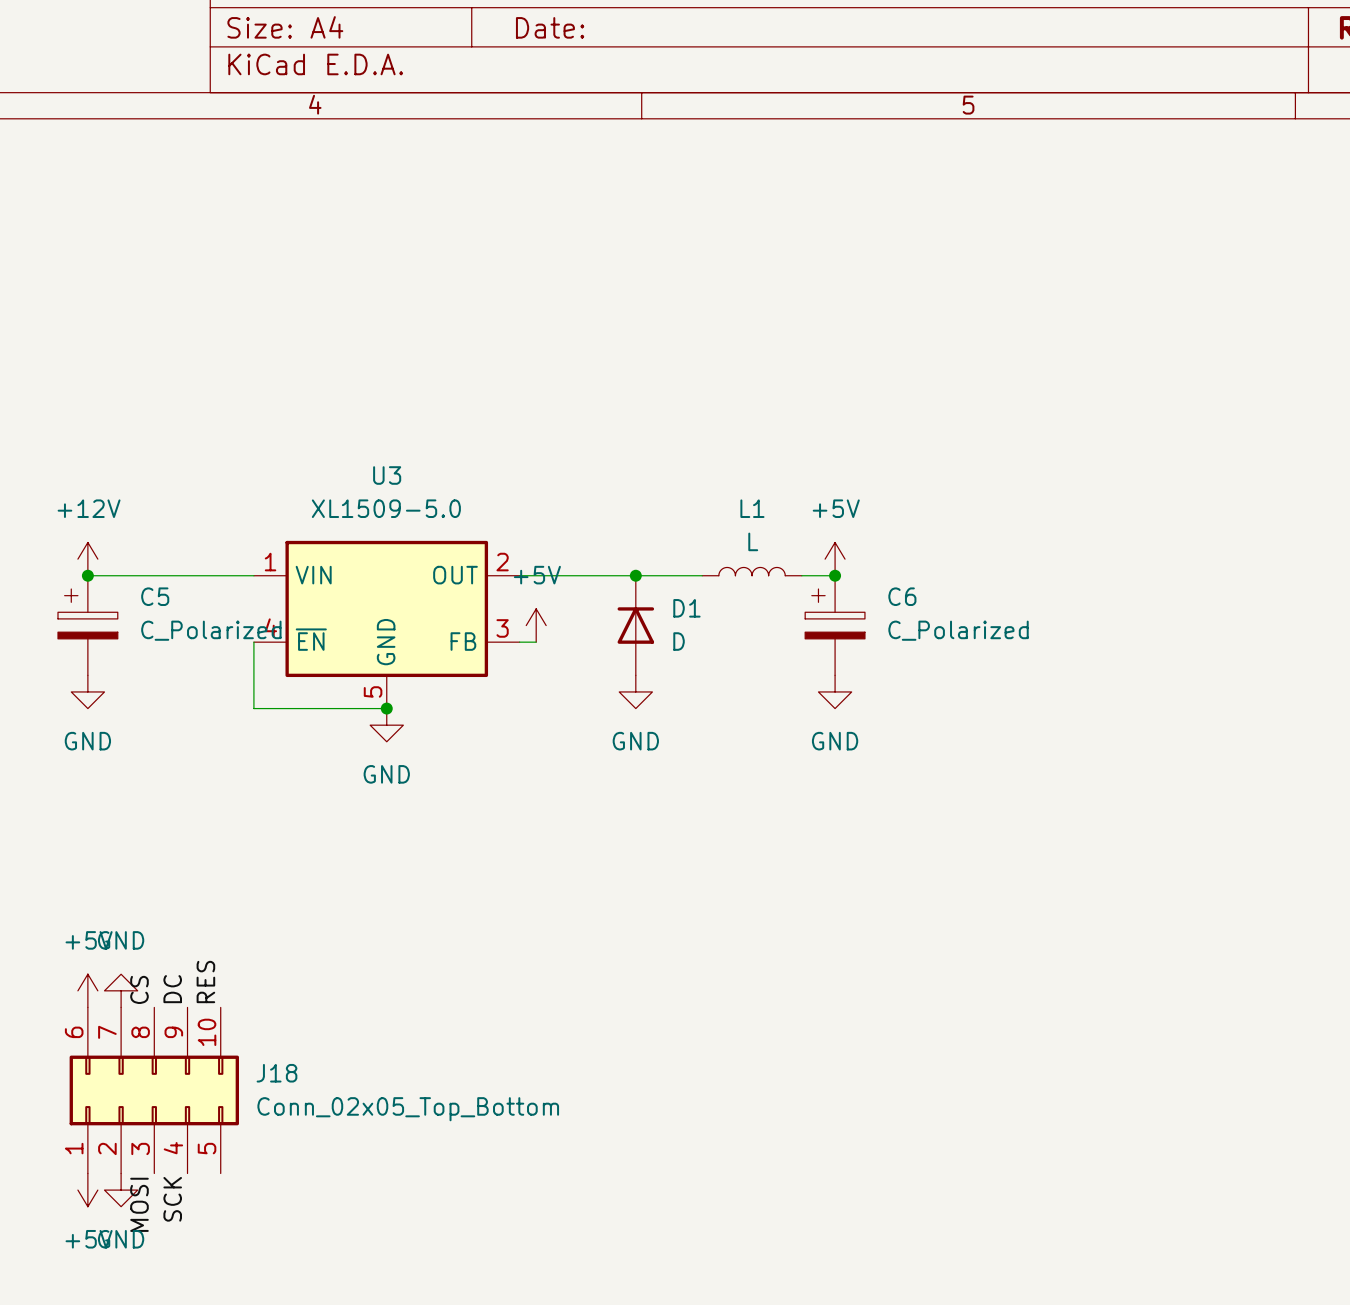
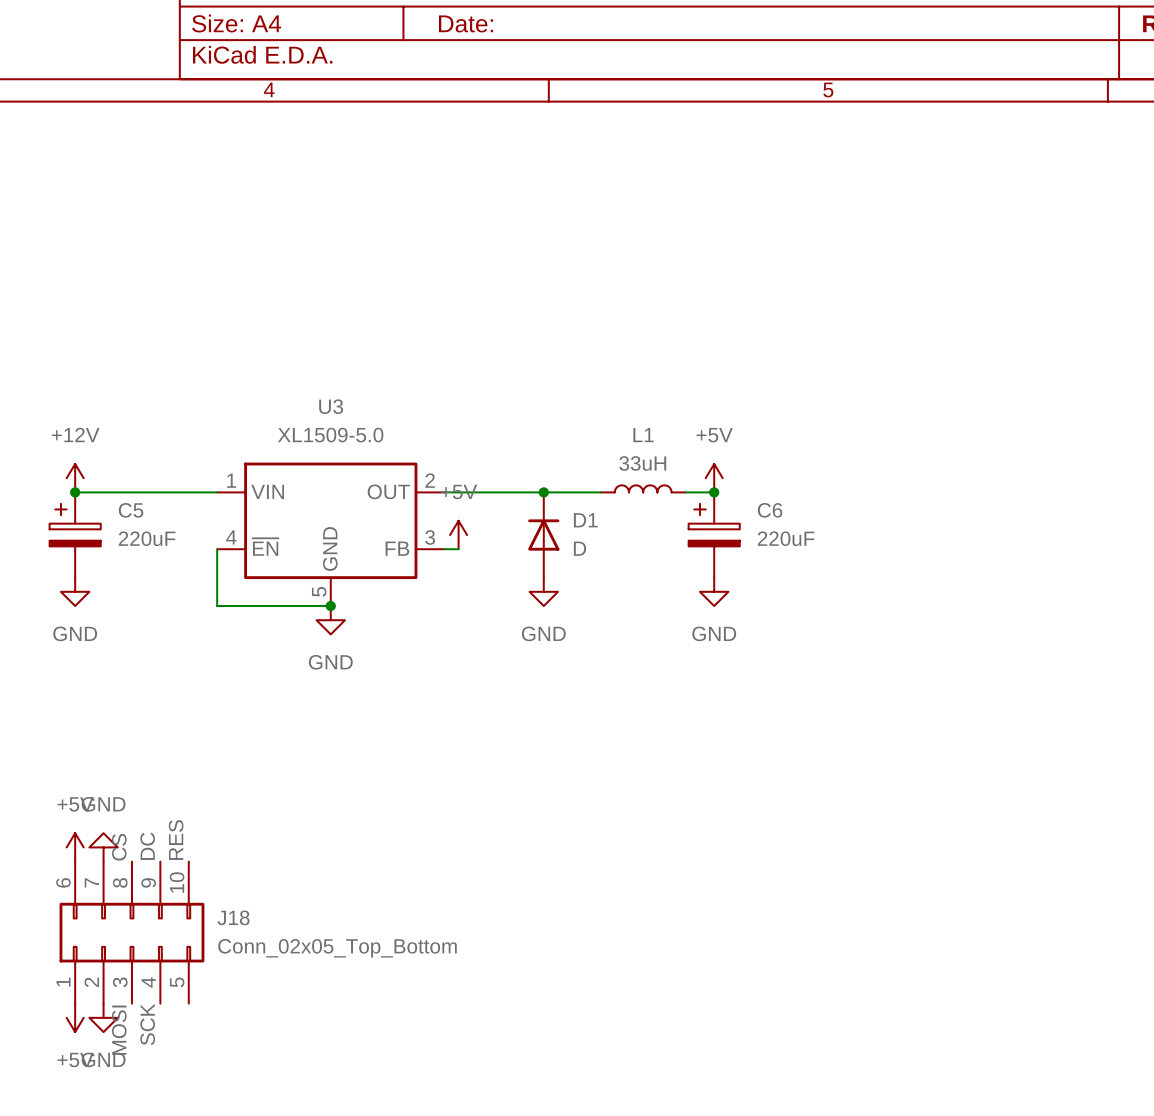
L1 value: L (753, 541) -> 33uH (642, 463)
C5 value: C_Polarized (211, 630) -> 220uF (147, 538)
C6 value: C_Polarized (958, 630) -> 220uF (786, 538)

